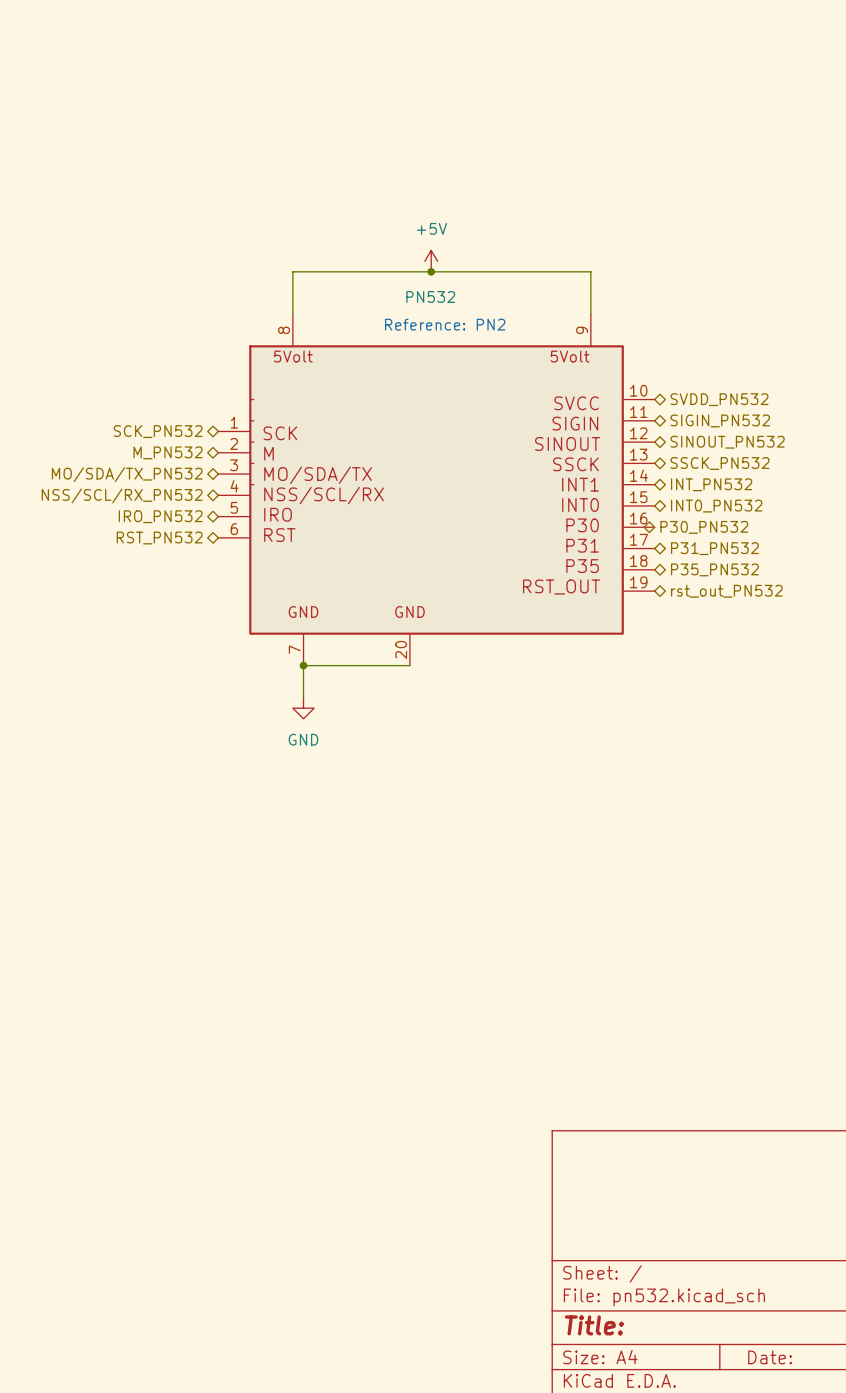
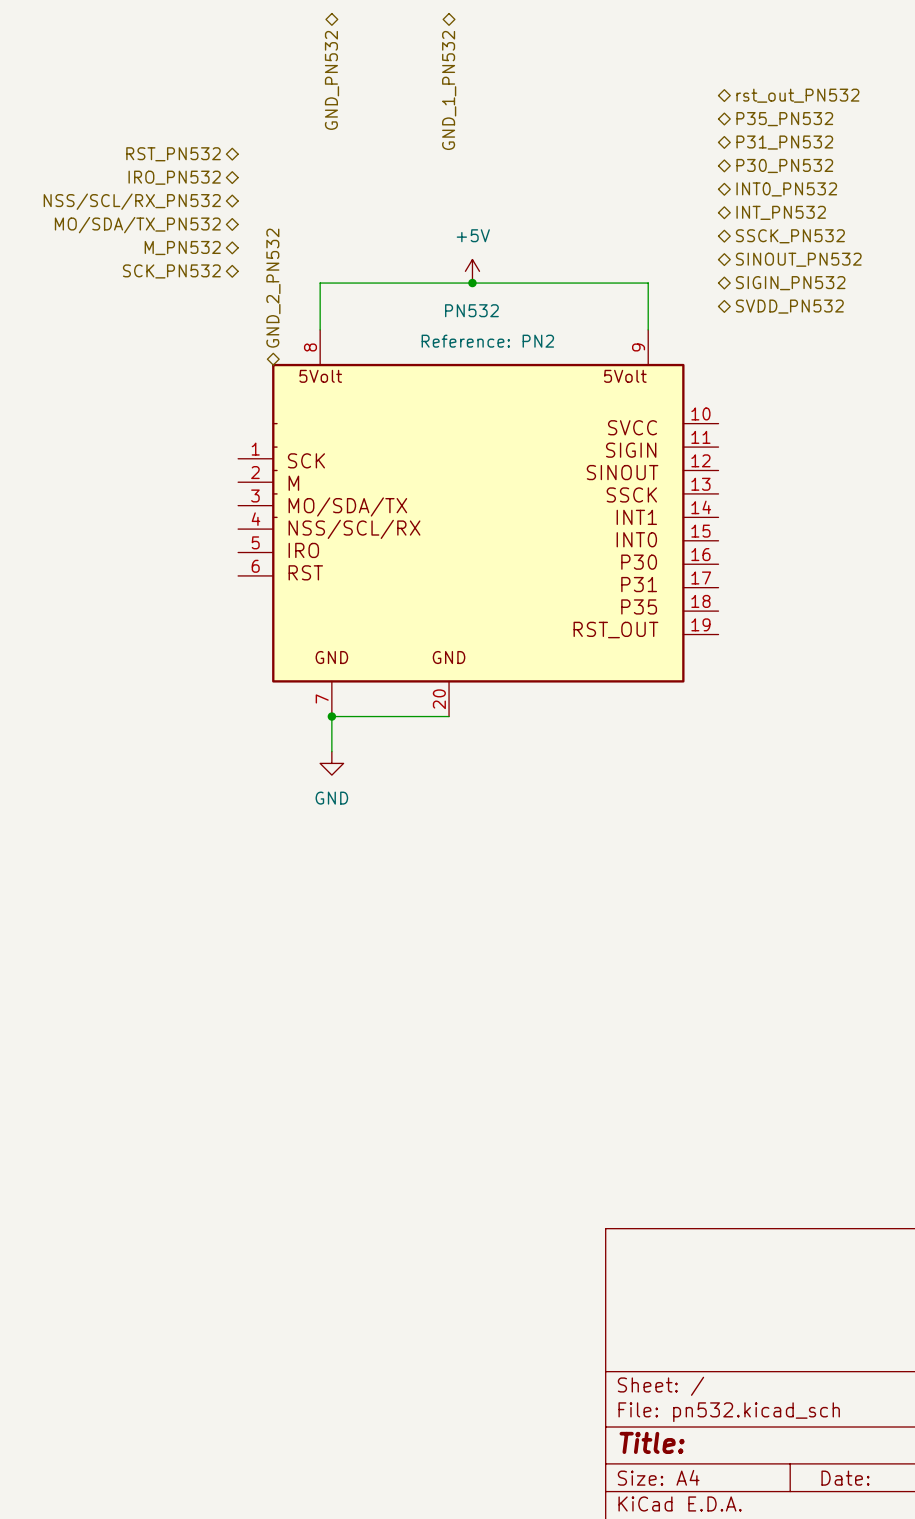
hierarchical label: none -> GND_PN532 (331, 80)
hierarchical label: none -> GND_1_PN532 (449, 90)
hierarchical label: none -> rst_out_PN532 (797, 95)
hierarchical label: none -> P35_PN532 (784, 119)
hierarchical label: none -> P31_PN532 (784, 142)
hierarchical label: none -> RST_PN532 (173, 154)
hierarchical label: none -> P30_PN532 (784, 165)
hierarchical label: none -> IRO_PN532 (174, 177)
hierarchical label: none -> INT0_PN532 (786, 189)
hierarchical label: none -> NSS/SCL/RX_PN532 (132, 201)
hierarchical label: none -> INT_PN532 (781, 212)
hierarchical label: none -> MO/SDA/TX_PN532 (137, 225)
hierarchical label: none -> SSCK_PN532 (790, 236)
hierarchical label: none -> M_PN532 (182, 248)
hierarchical label: none -> GND_2_PN532 (273, 288)
hierarchical label position: SVDD_PN532 (719, 399) -> SVDD_PN532 (789, 306)
hierarchical label position: SIGIN_PN532 (720, 420) -> SIGIN_PN532 (790, 283)
hierarchical label position: SCK_PN532 (158, 431) -> SCK_PN532 (171, 271)
hierarchical label position: SINOUT_PN532 (727, 442) -> SINOUT_PN532 (798, 259)
hierarchical label: M_PN532 (168, 452) -> none
hierarchical label: SSCK_PN532 (719, 463) -> none
hierarchical label: MO/SDA/TX_PN532 (127, 474) -> none
hierarchical label: INT_PN532 (711, 484) -> none
hierarchical label: NSS/SCL/RX_PN532 (122, 495) -> none
hierarchical label: INT0_PN532 (716, 506) -> none
hierarchical label: IRO_PN532 (160, 516) -> none
hierarchical label: P30_PN532 (704, 527) -> none
hierarchical label: RST_PN532 (159, 538) -> none
hierarchical label: P31_PN532 (714, 548) -> none
hierarchical label: P35_PN532 (714, 569) -> none
hierarchical label: rst_out_PN532 (726, 591) -> none

